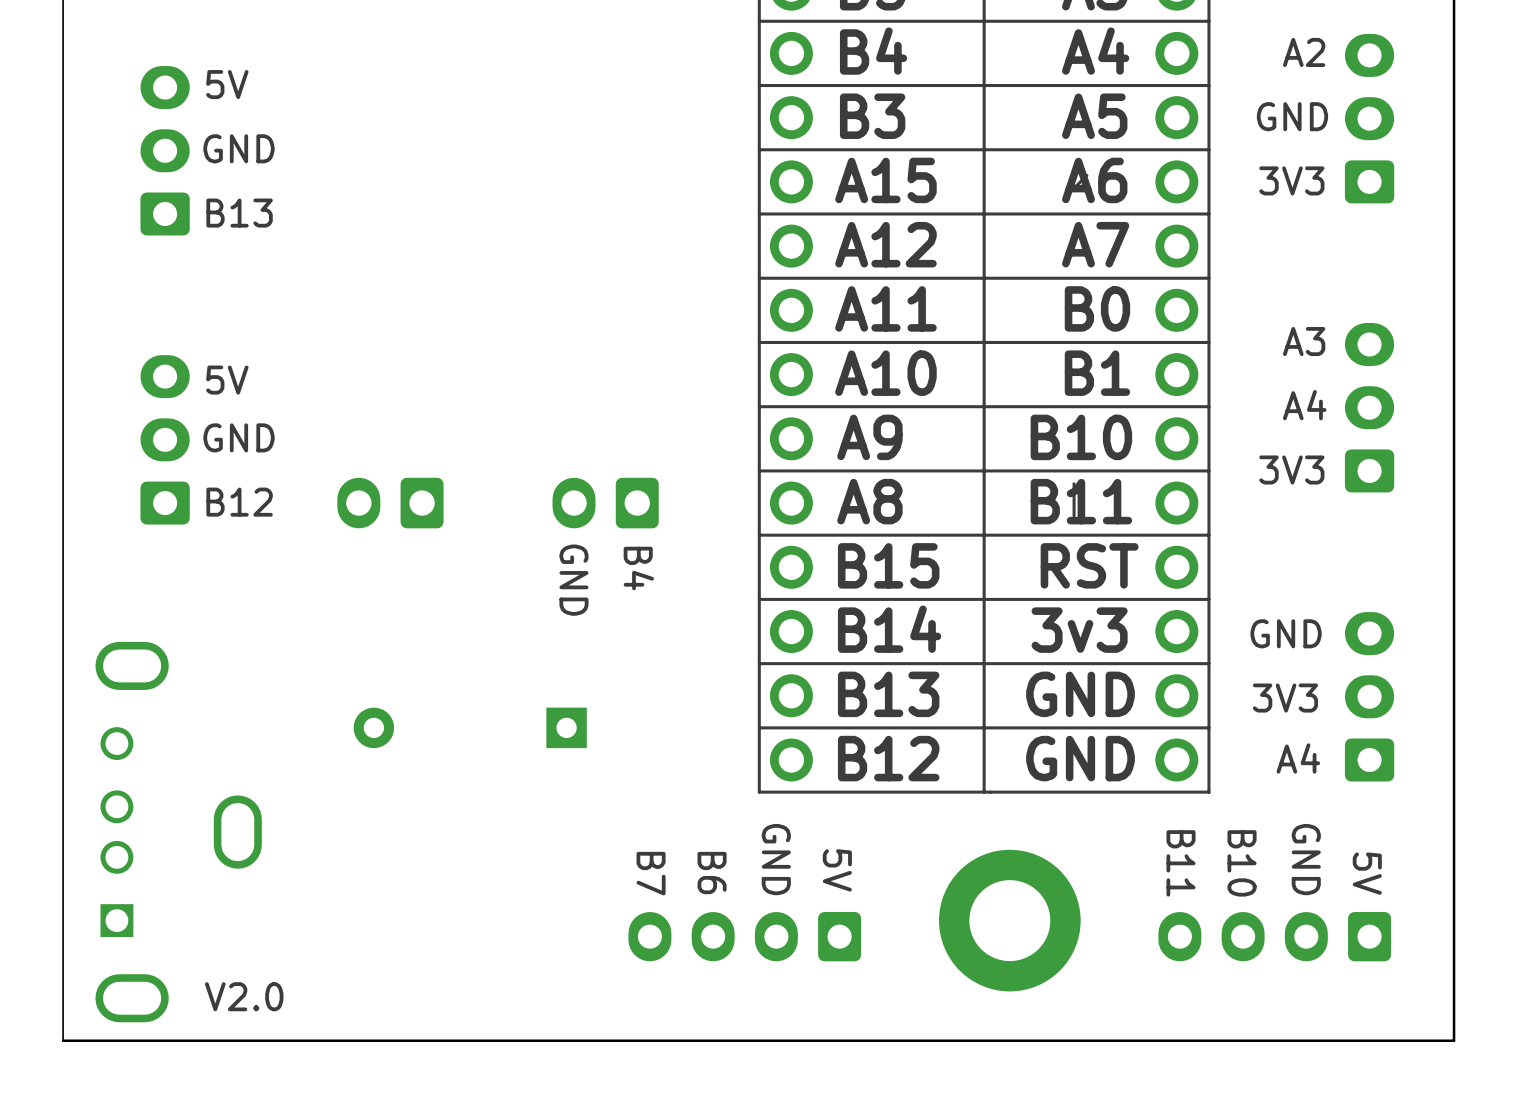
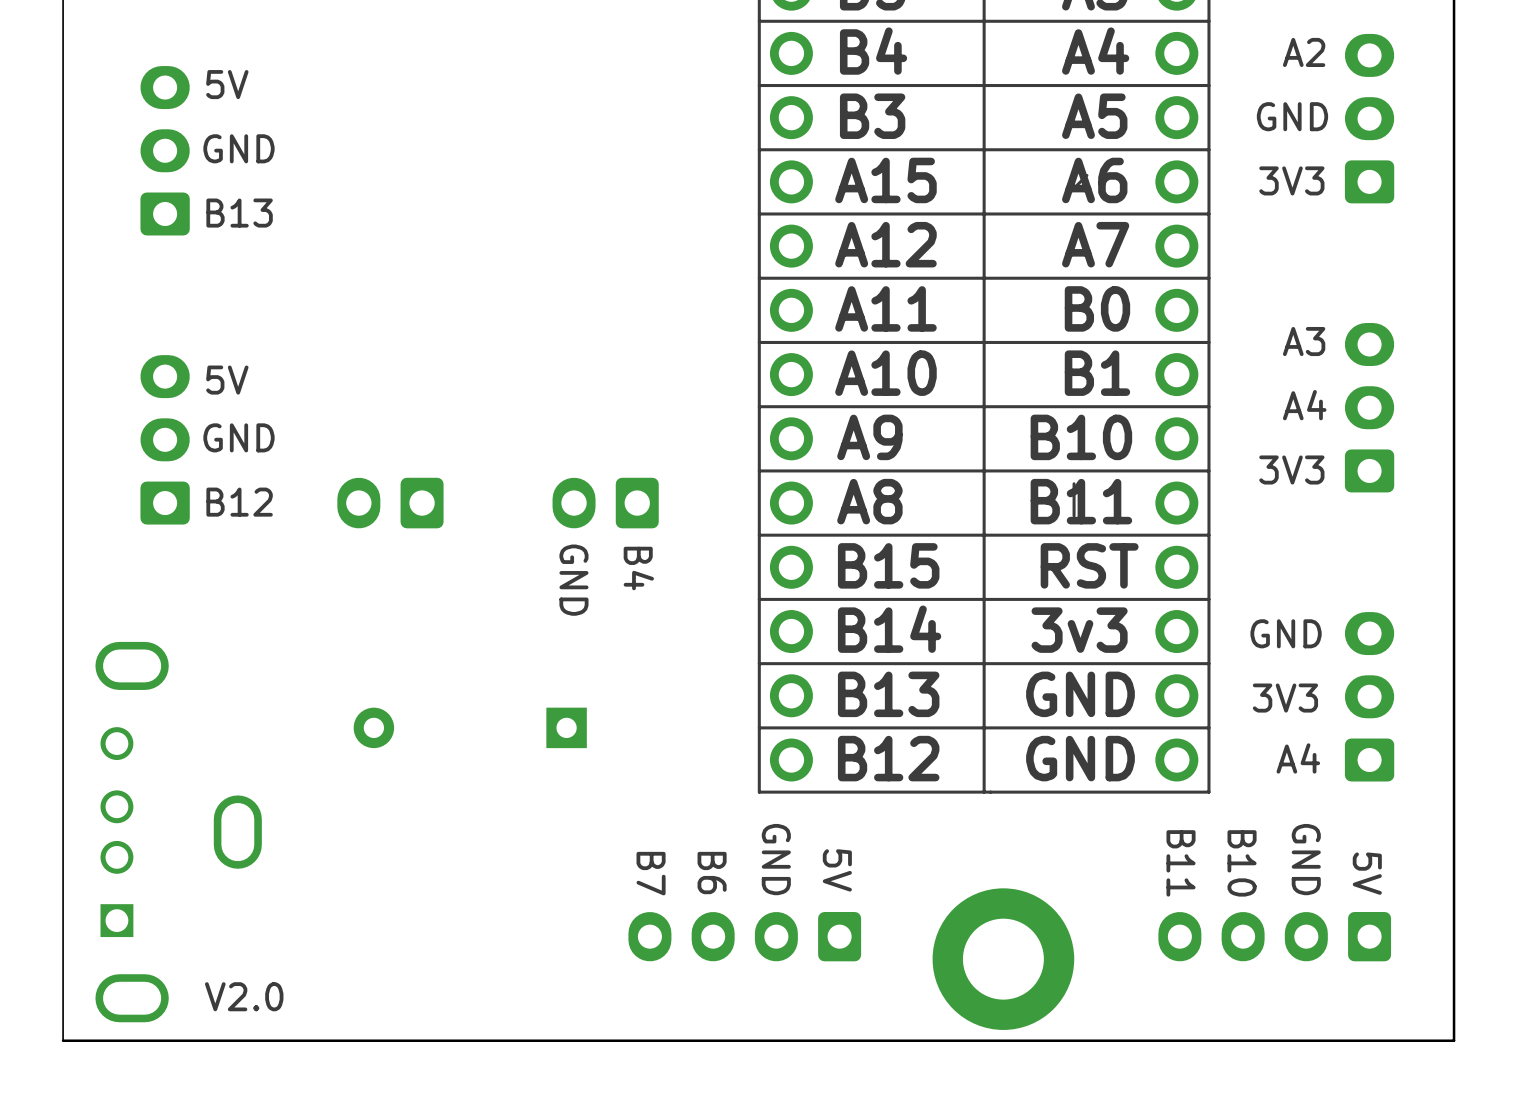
part position: (1009, 920) -> (1003, 959)

